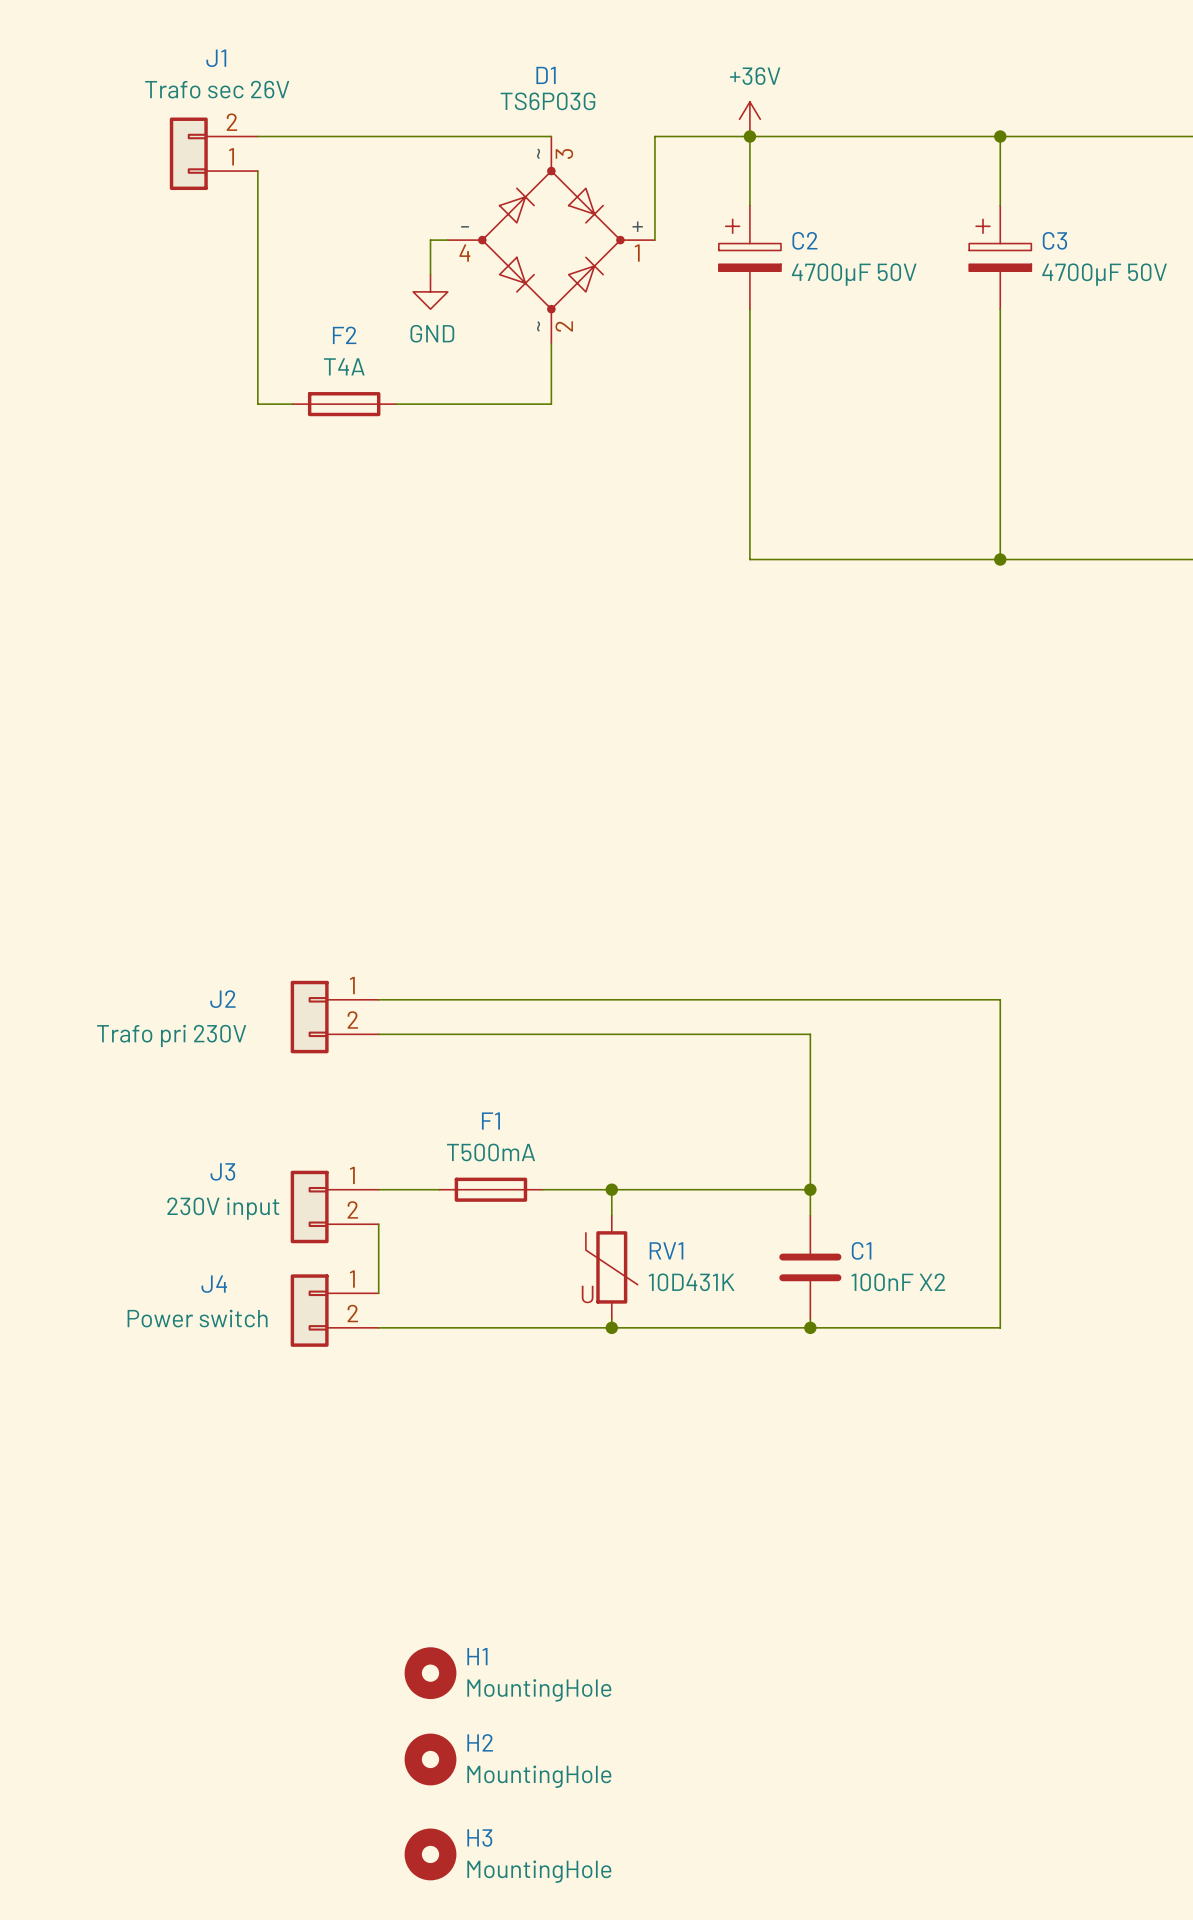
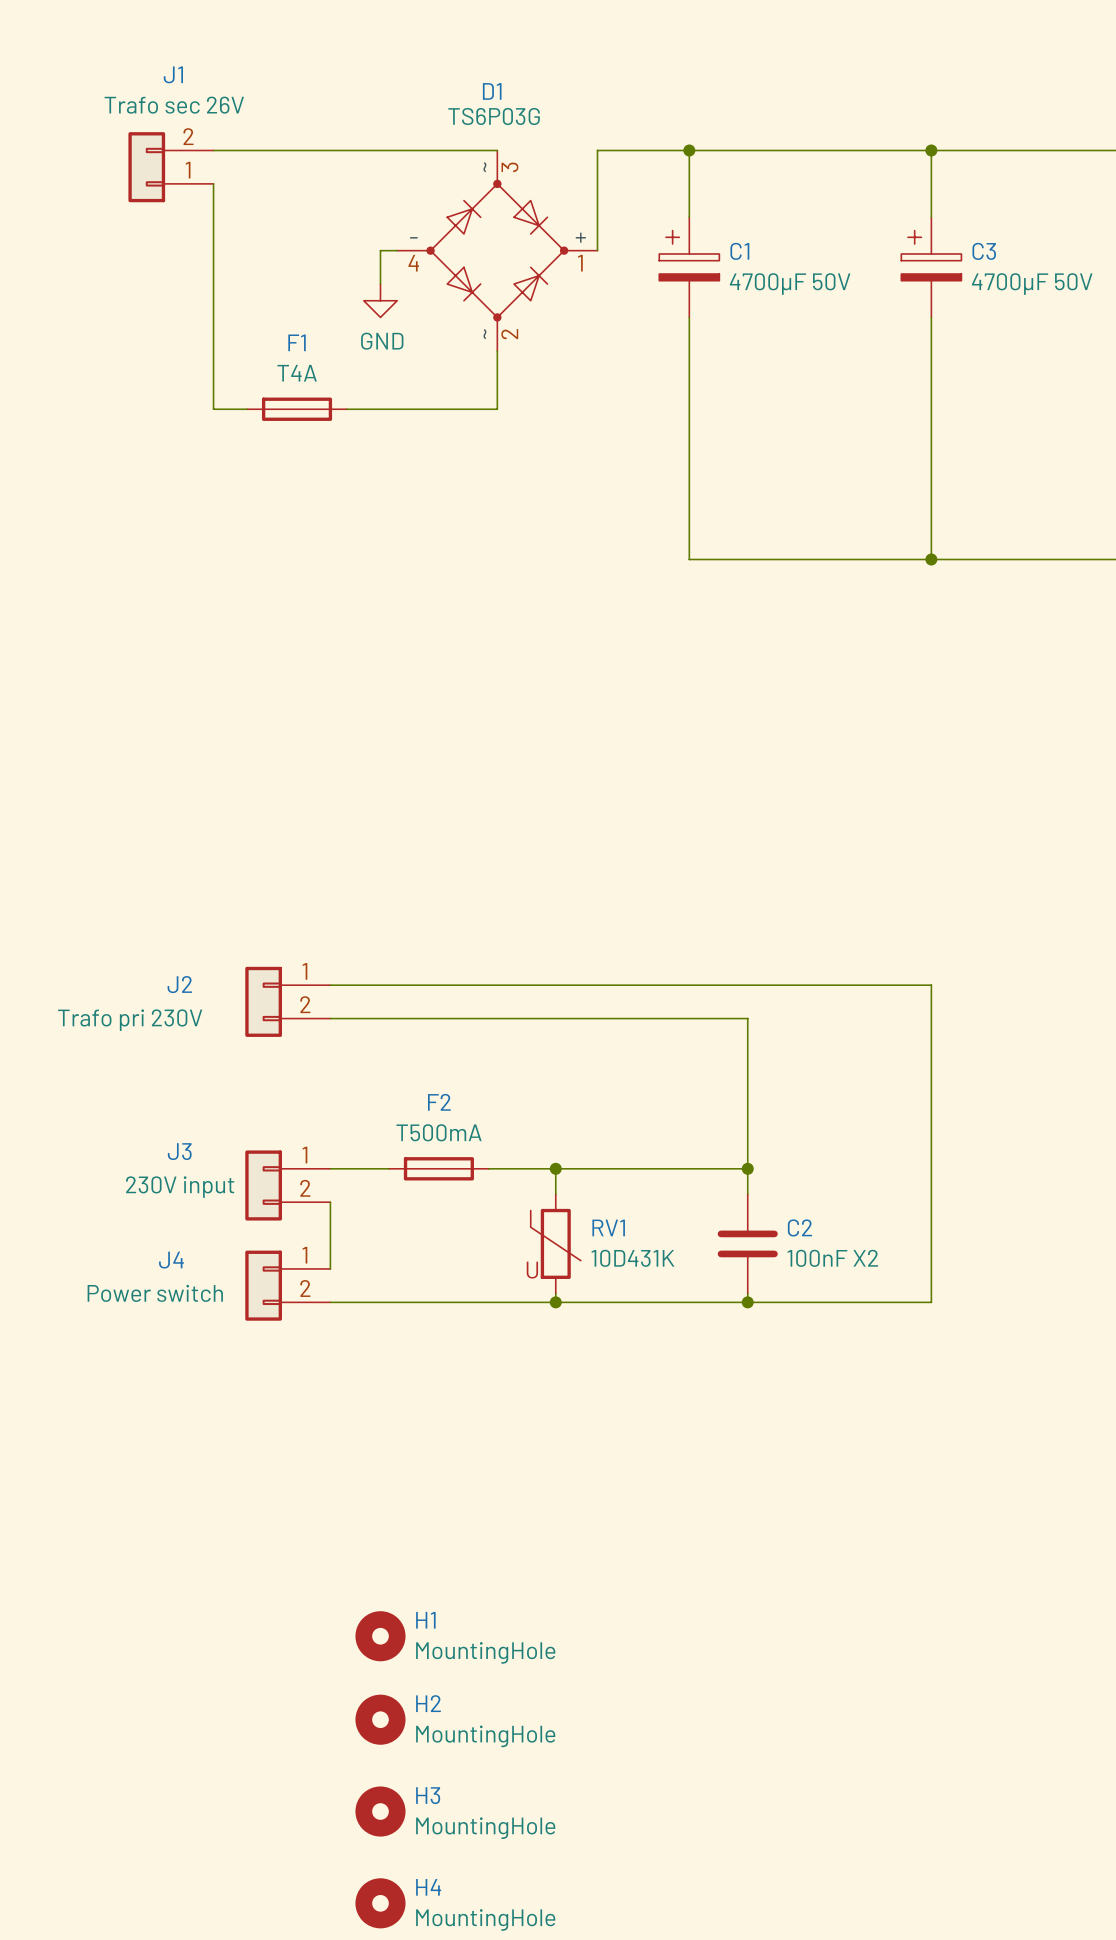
power symbol: +36V (749, 119) -> none
C2 name: C2 (804, 240) -> C1 (739, 251)
F2 name: F2 (344, 335) -> F1 (297, 342)
F1 name: F1 (490, 1121) -> F2 (439, 1102)
C1 name: C1 (861, 1250) -> C2 (799, 1227)

